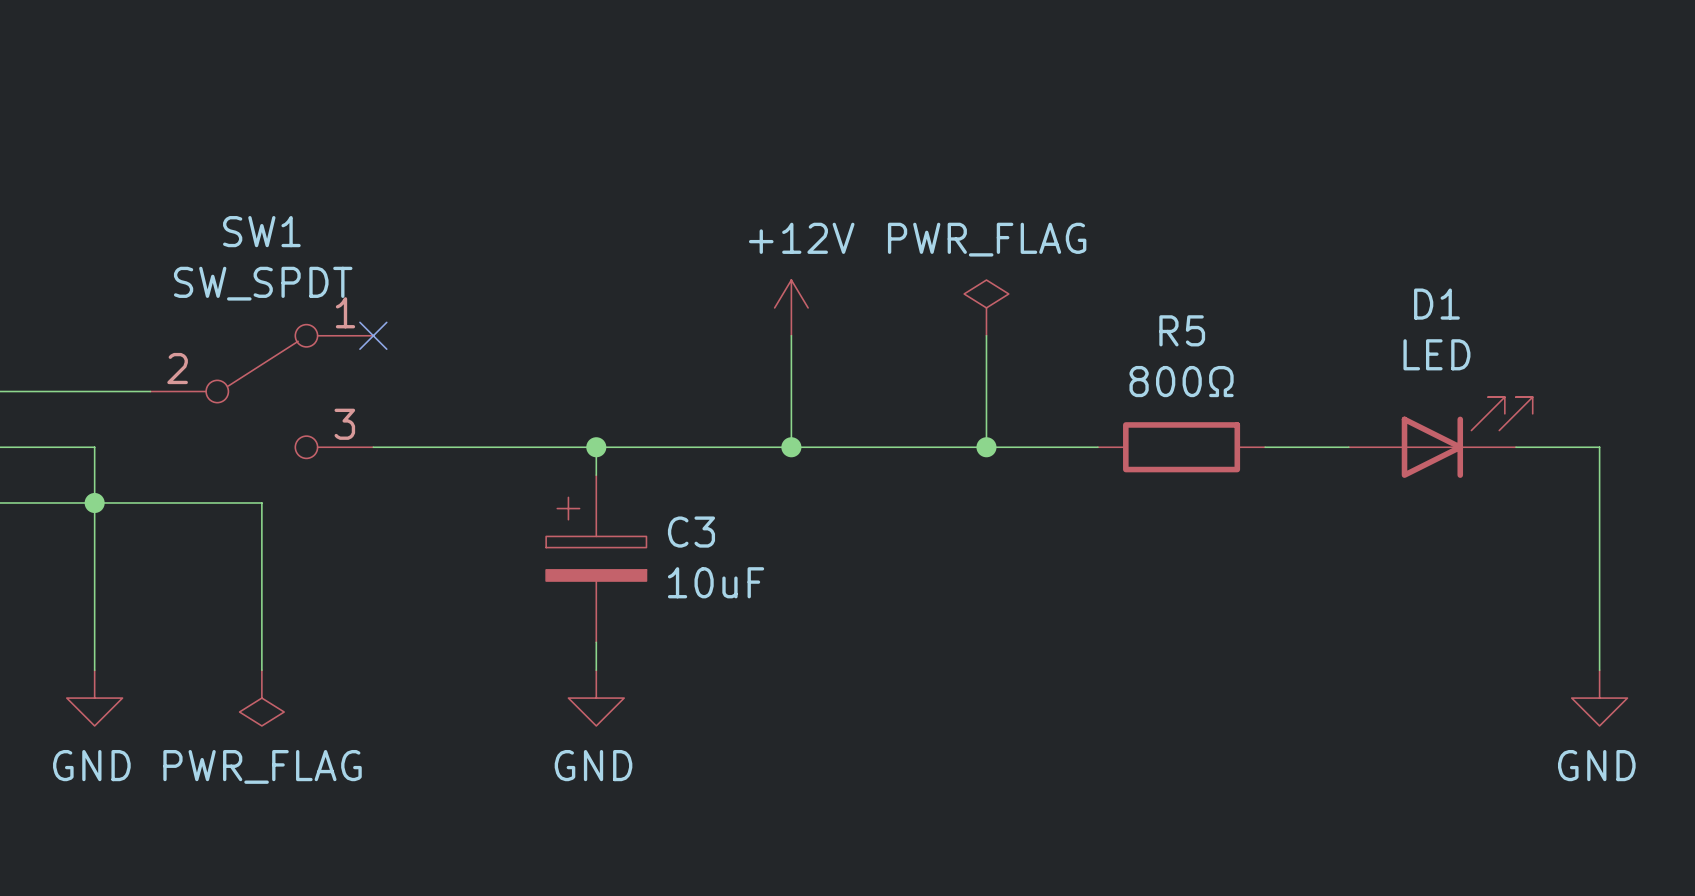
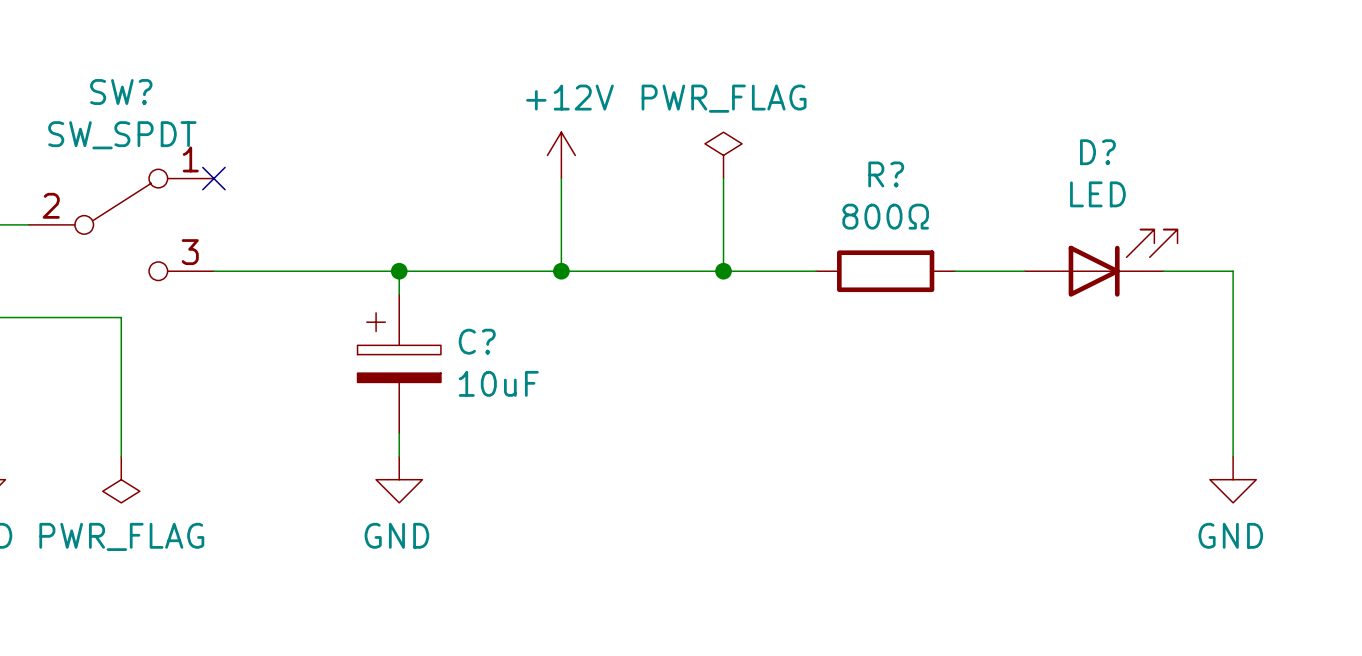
SW1 name: SW1 (261, 231) -> SW? (121, 92)
D1 name: D1 (1436, 304) -> D? (1097, 152)
R5 name: R5 (1182, 330) -> R? (886, 174)
C3 name: C3 (691, 532) -> C? (477, 341)

